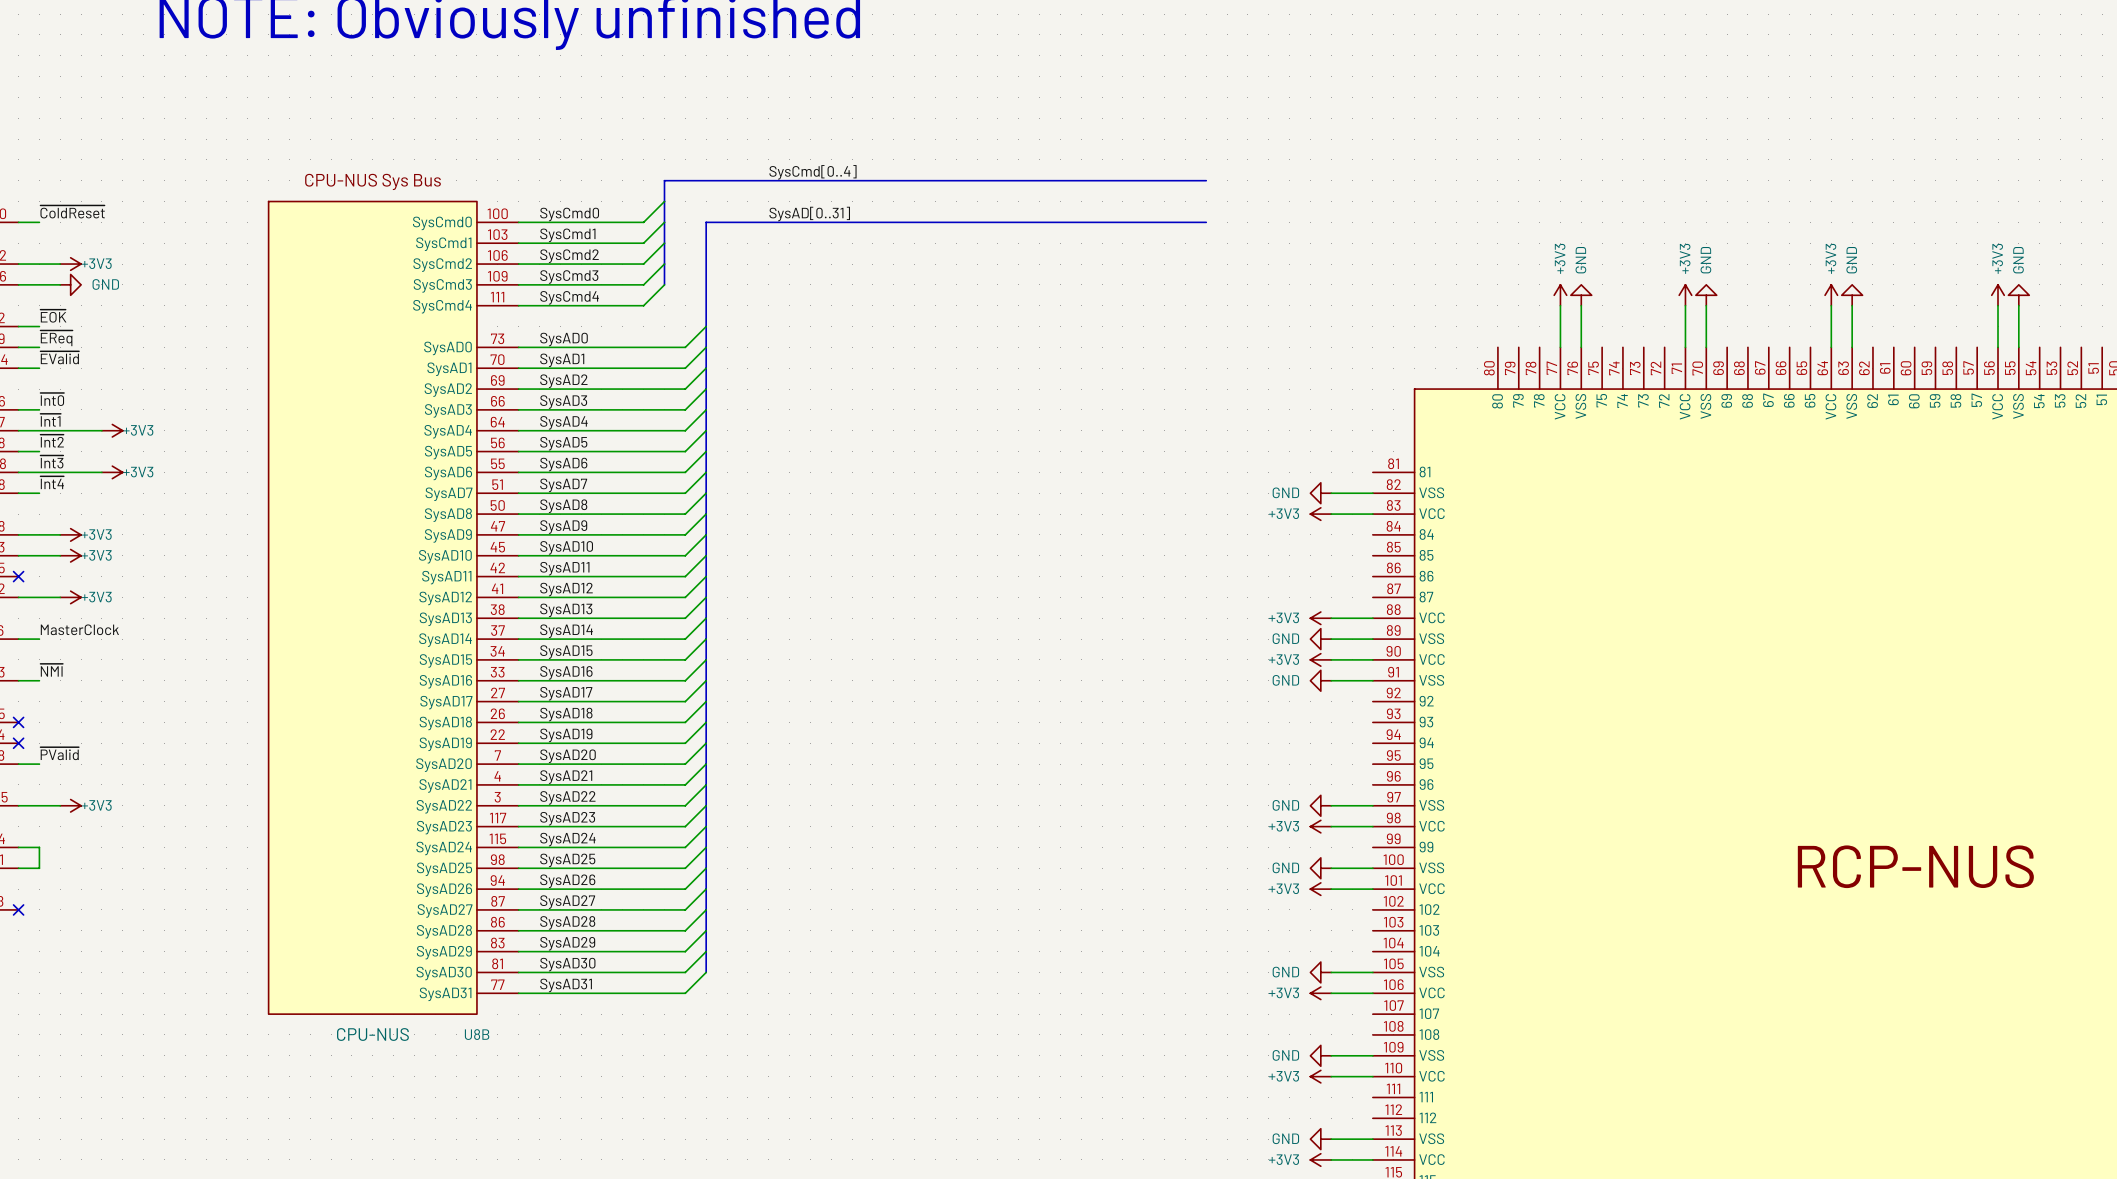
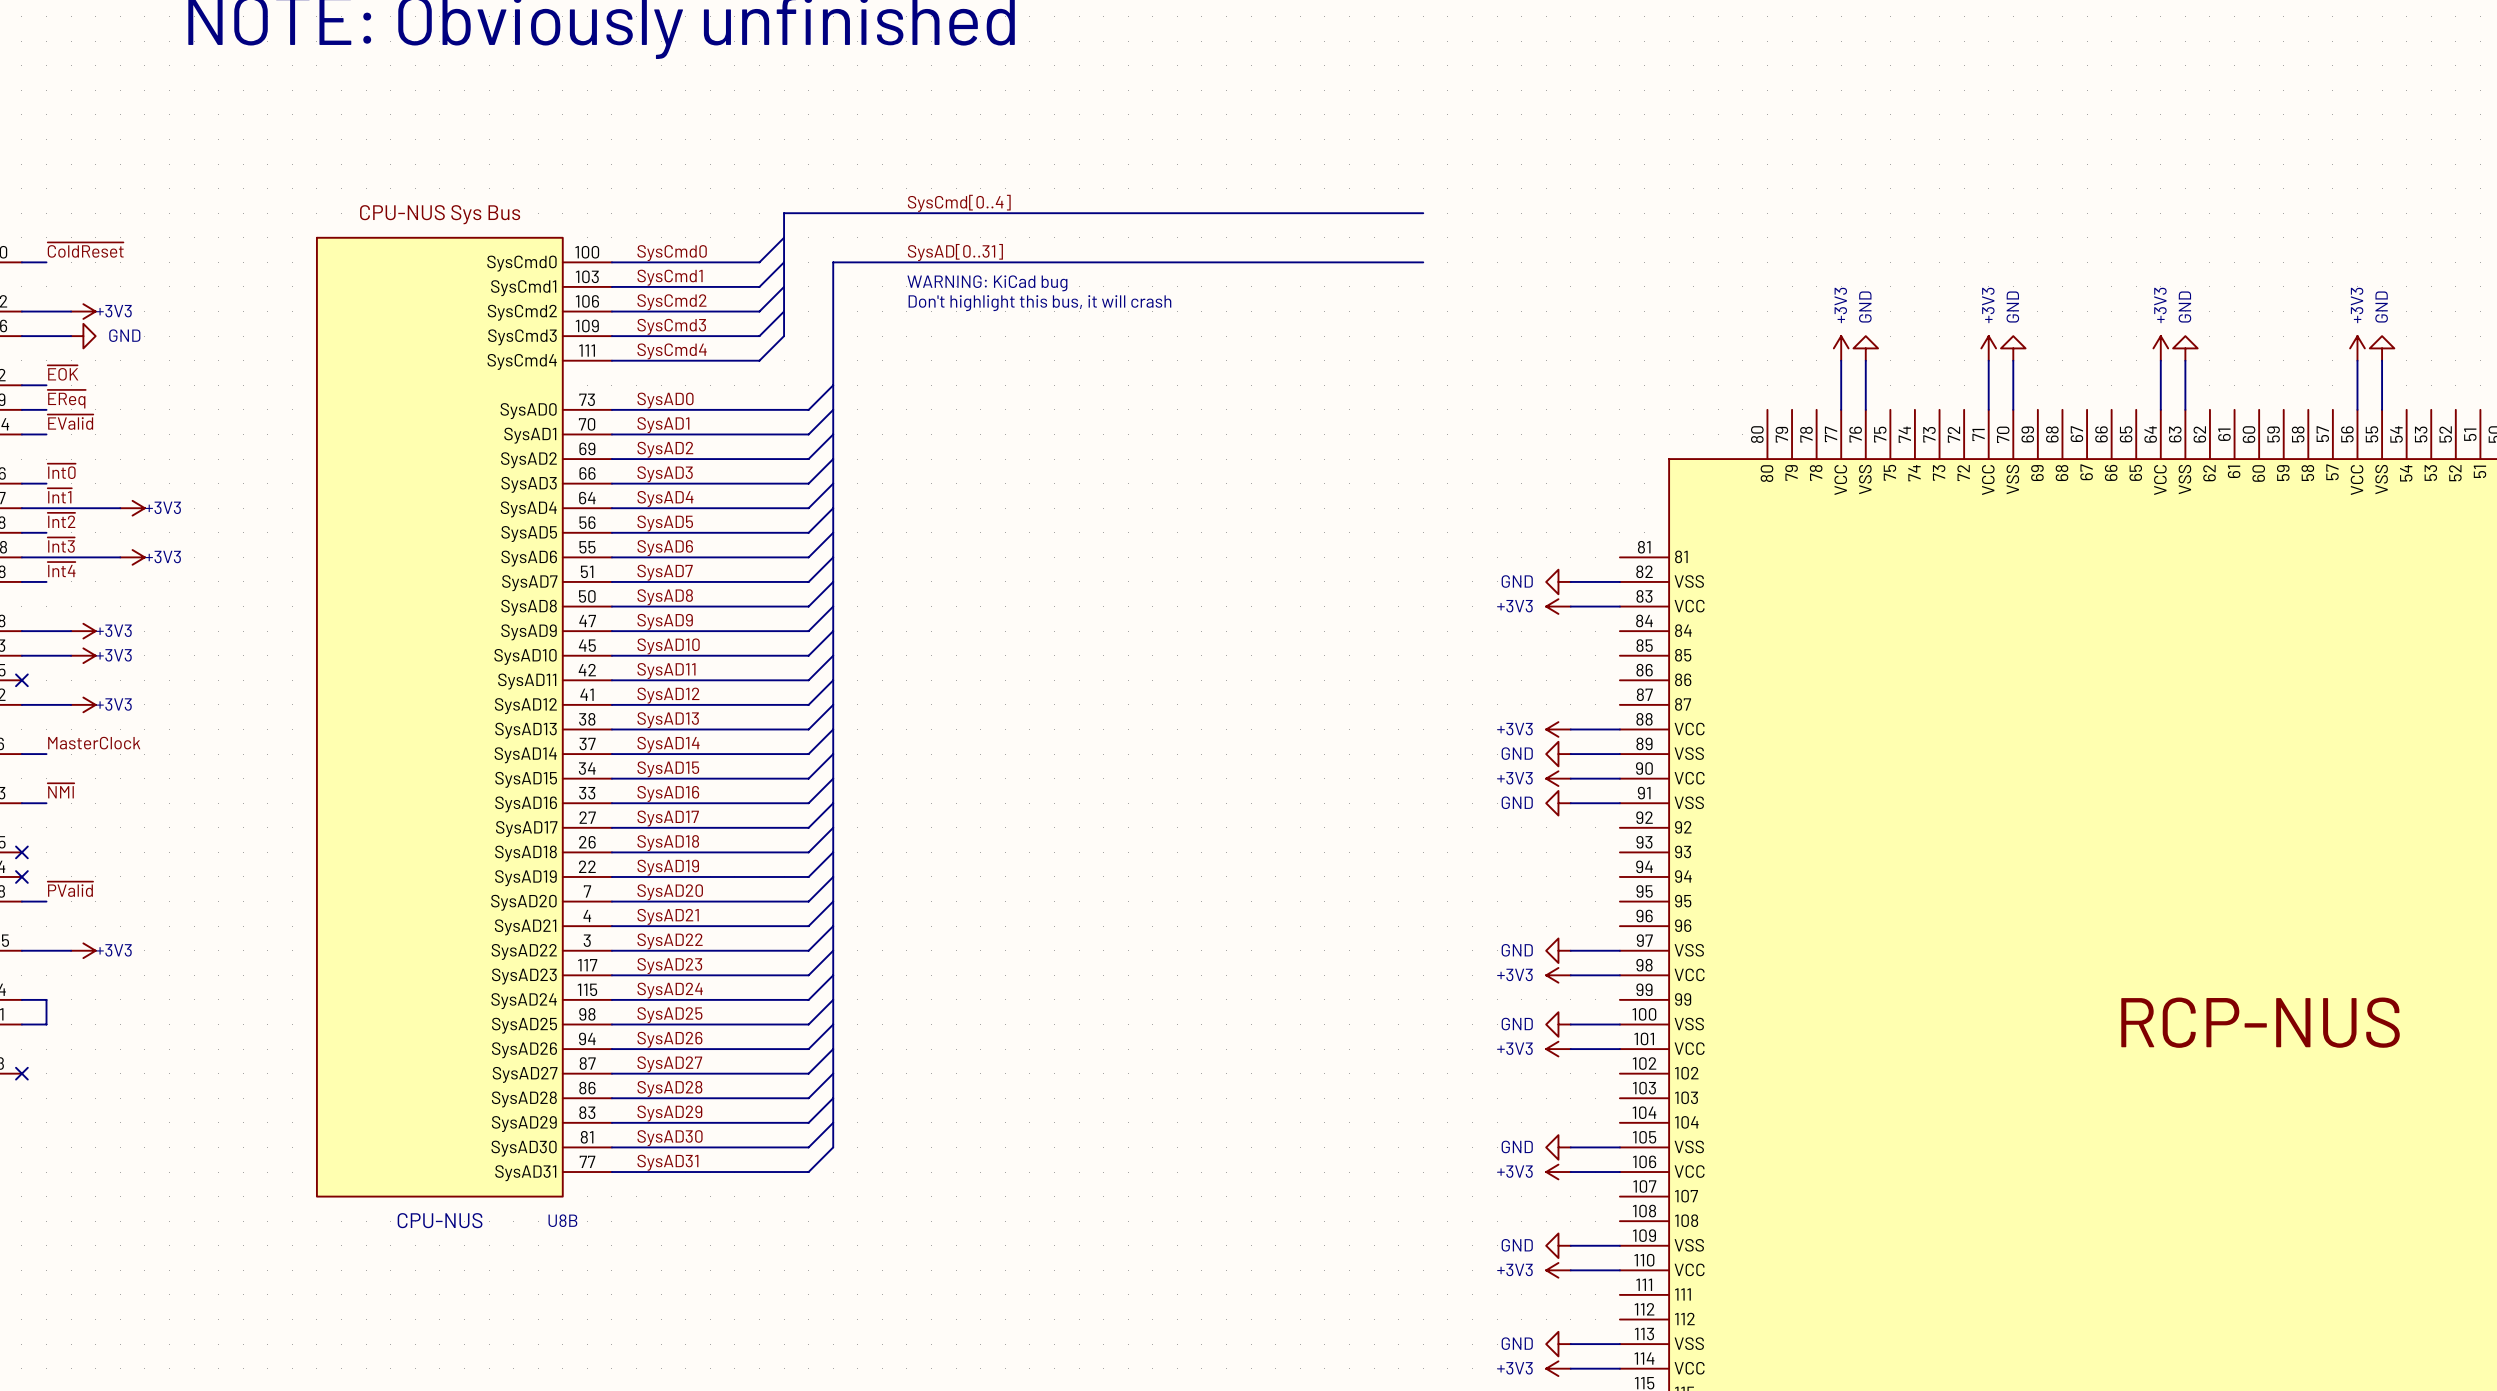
text: none -> WARNING: KiCad bug (987, 283)
text: none -> Don't highlight this bus, it will crash (1039, 303)

